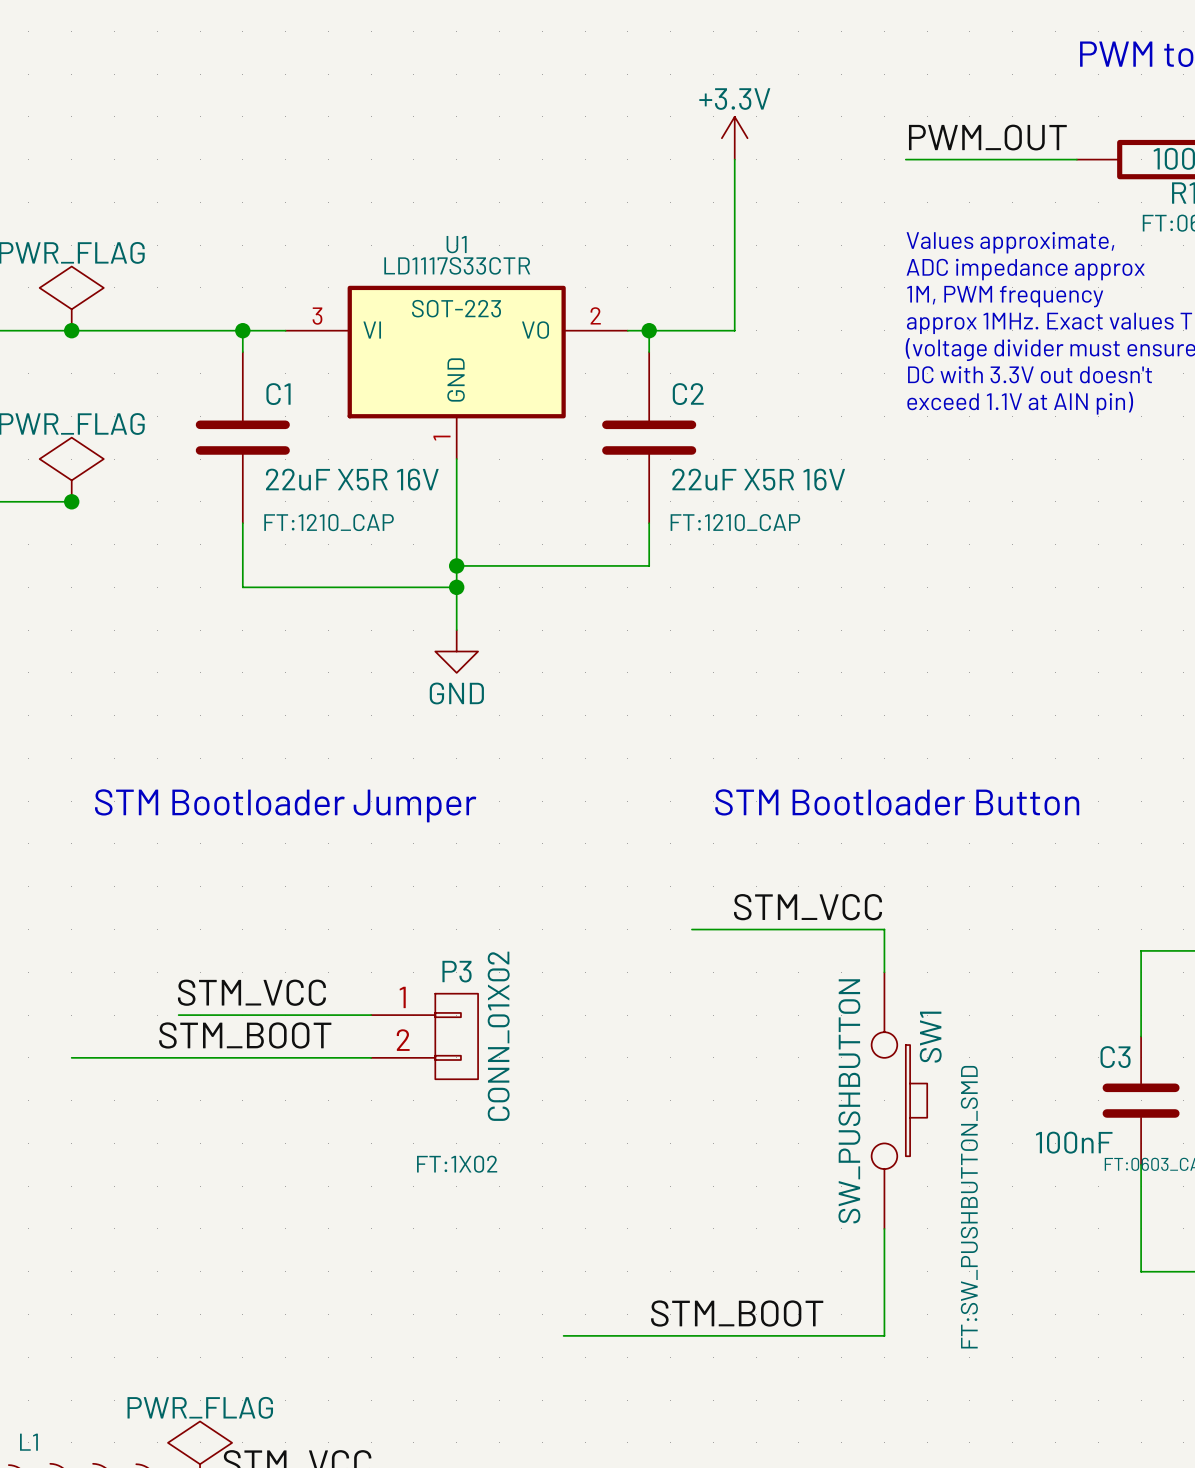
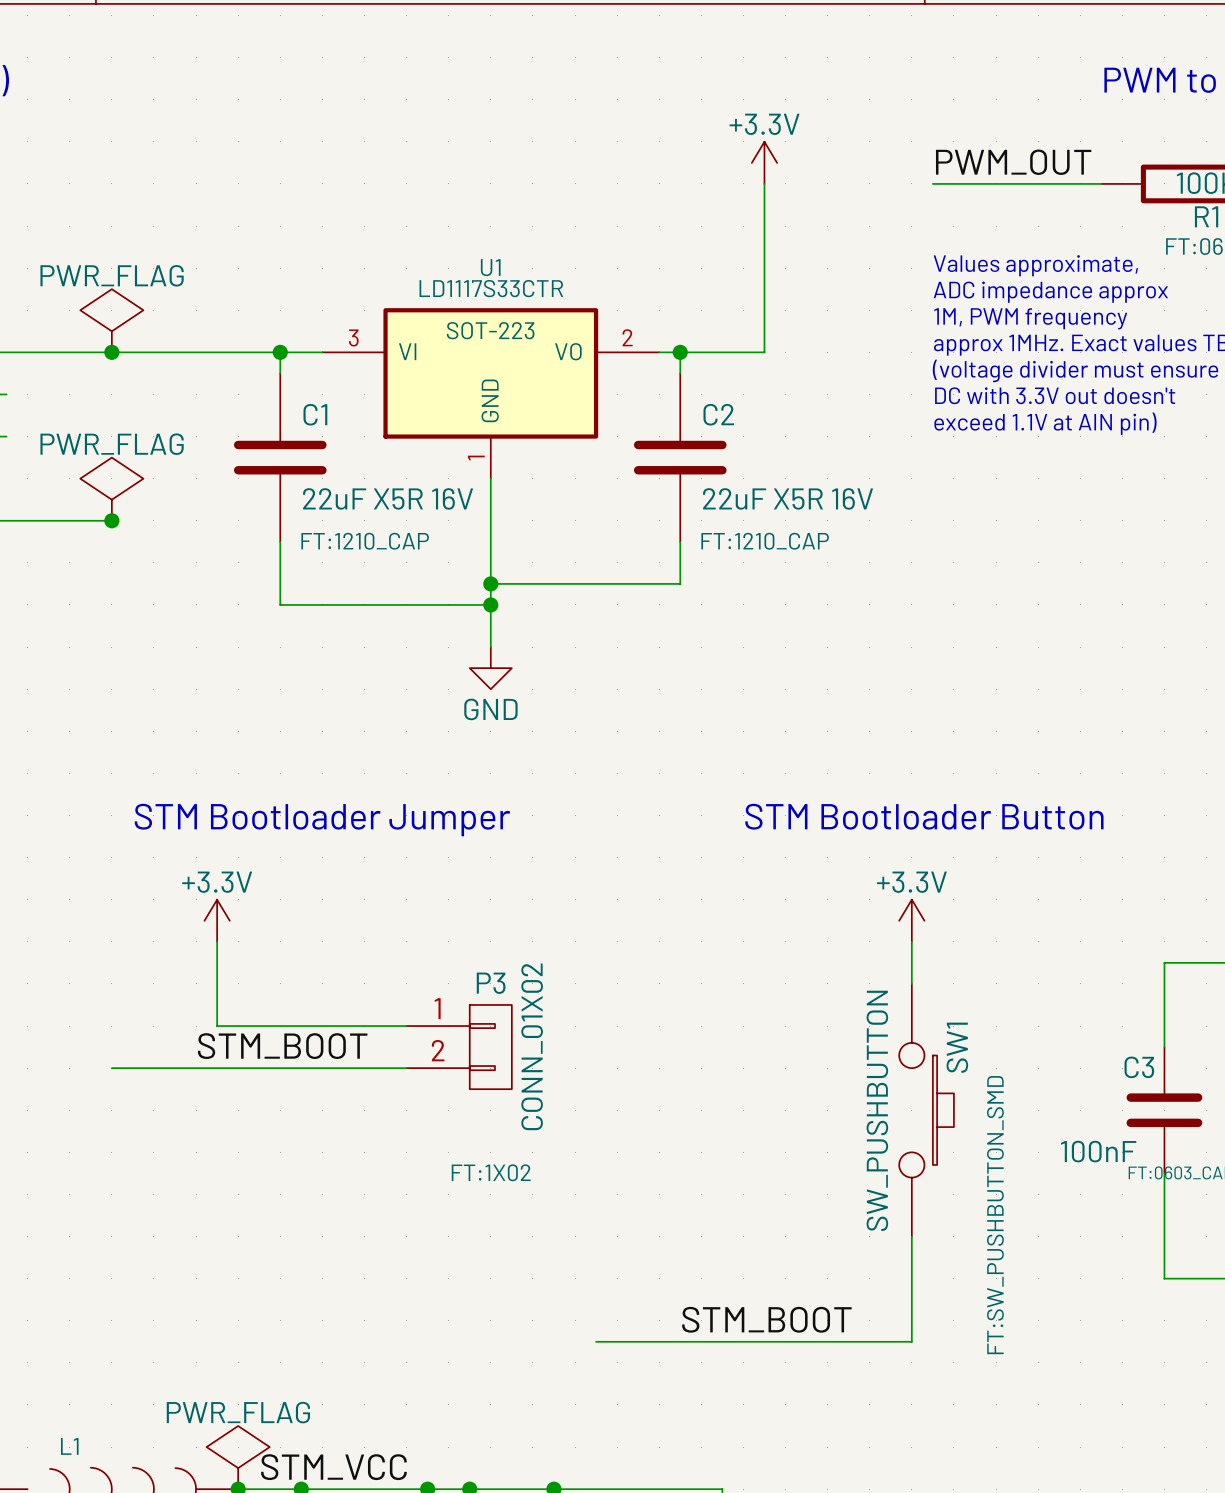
label: STM_VCC (808, 907) -> none
power symbol: none -> +3.3V (217, 920)
power symbol: none -> +3.3V (911, 920)
wire: none -> (217, 941) (217, 1026)
wire: (691, 929) (884, 929) -> none
label: STM_VCC (251, 992) -> none

